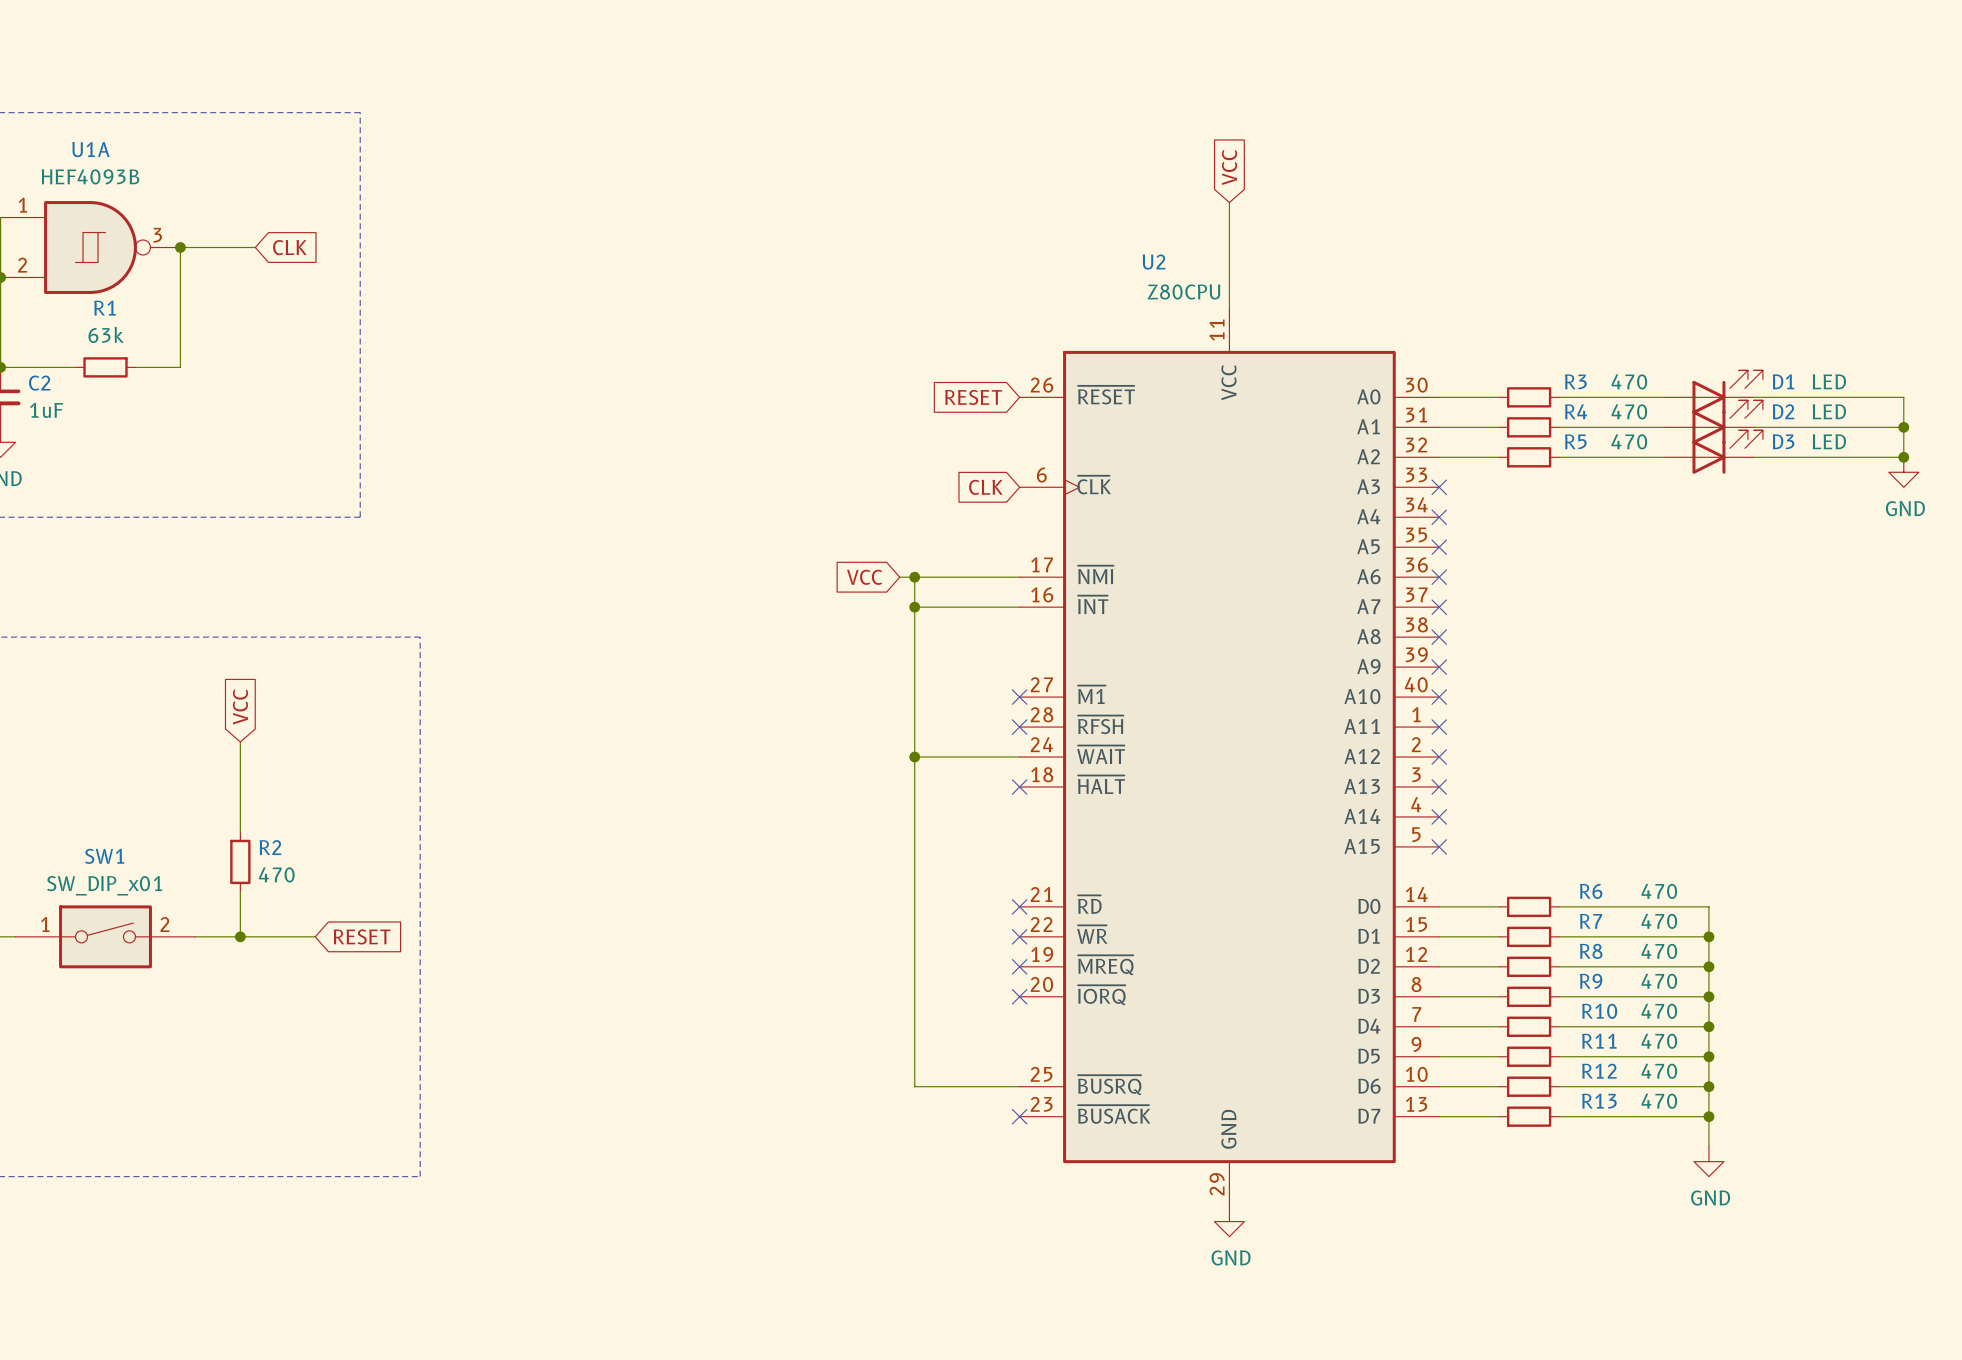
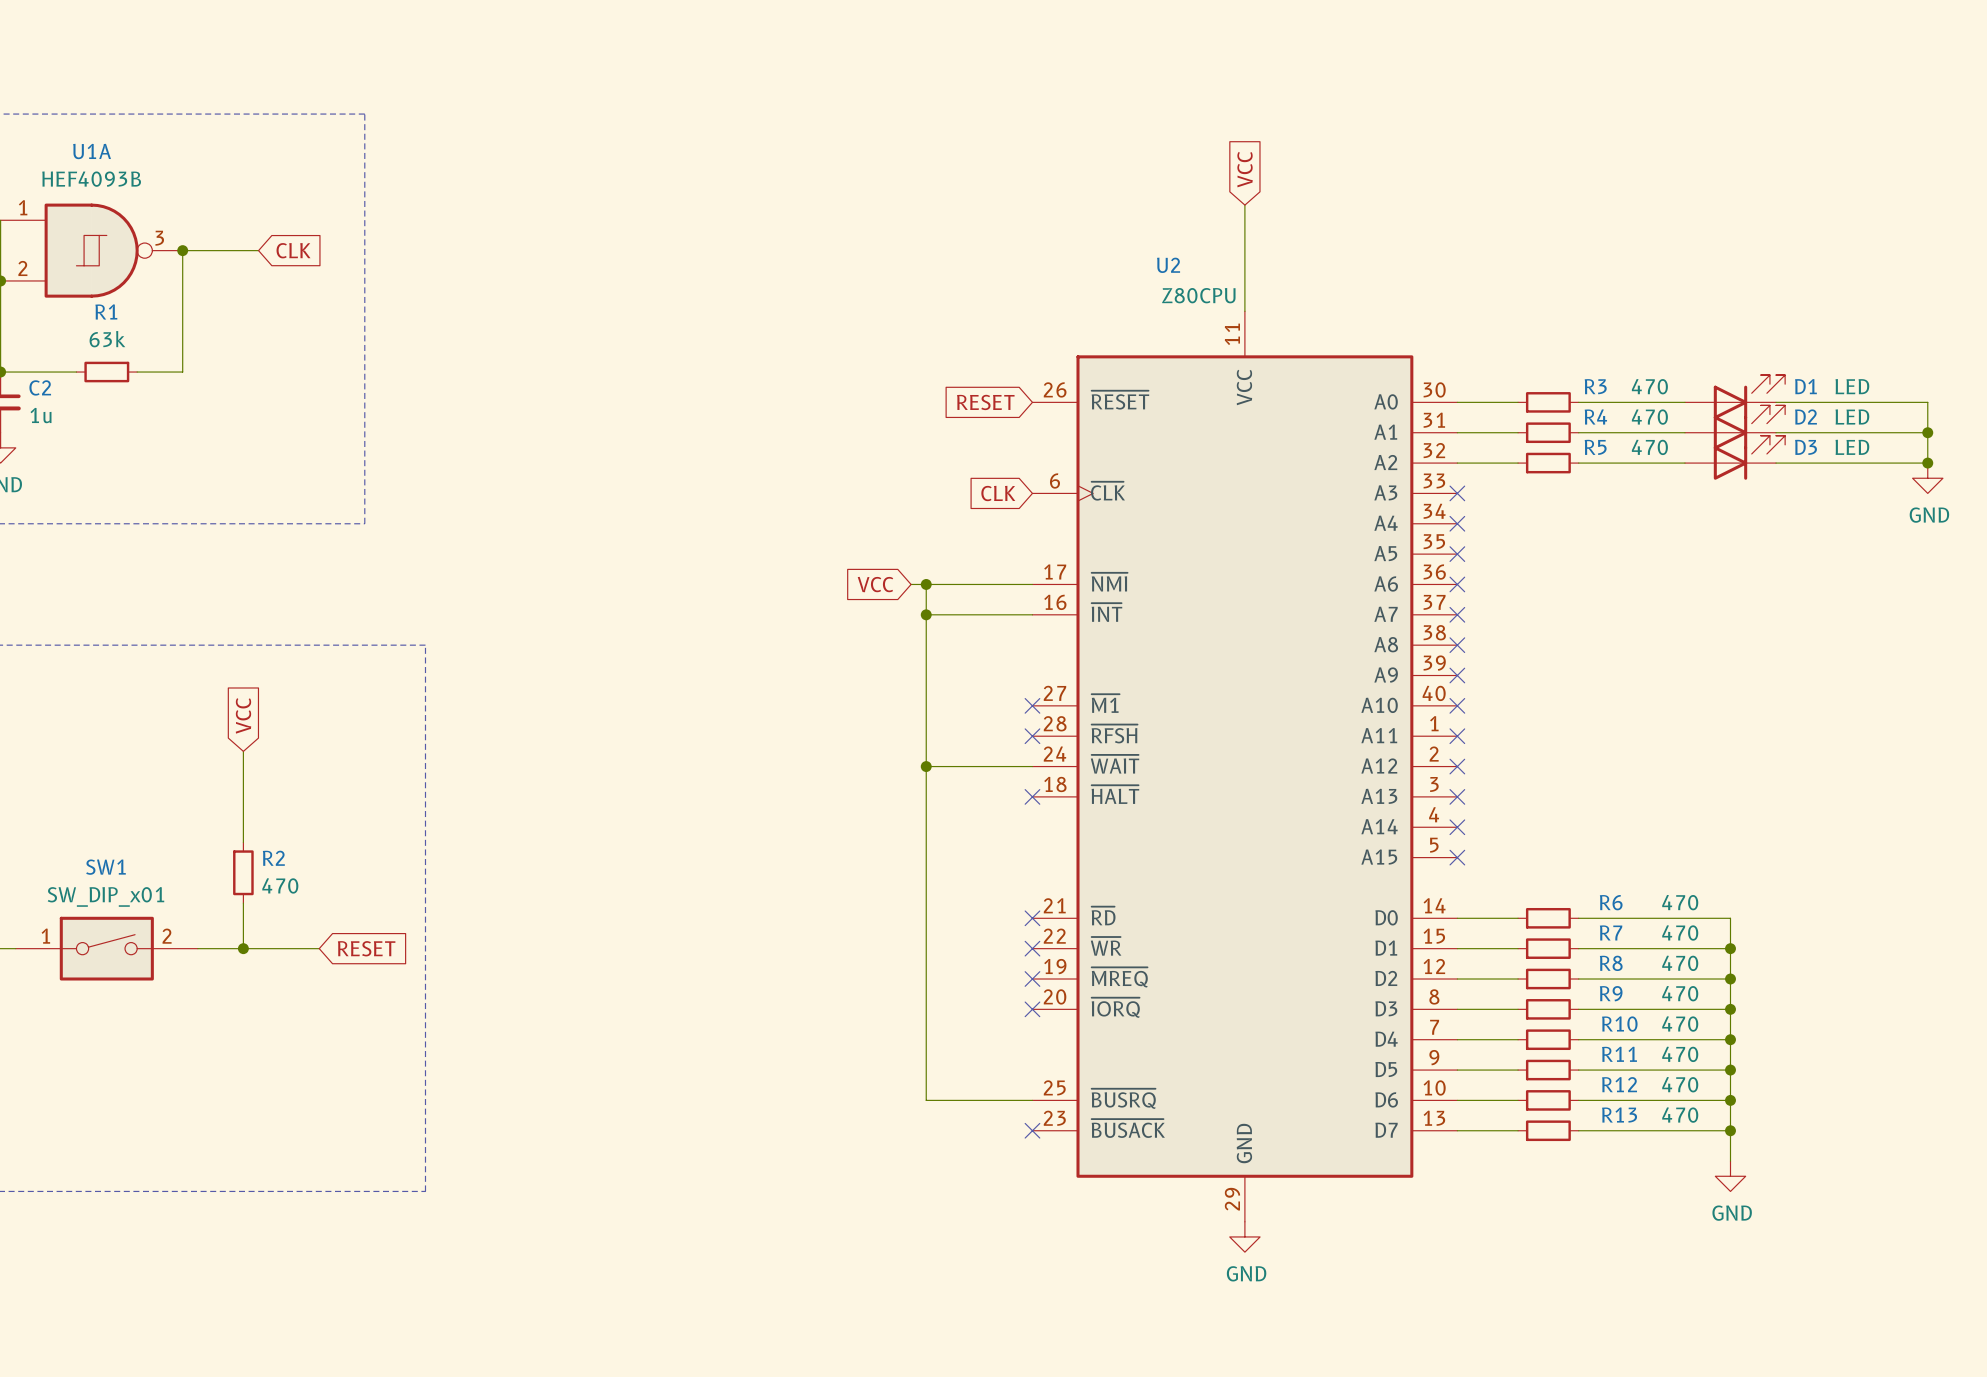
C2 value: 1uF (46, 410) -> 1u (40, 415)

